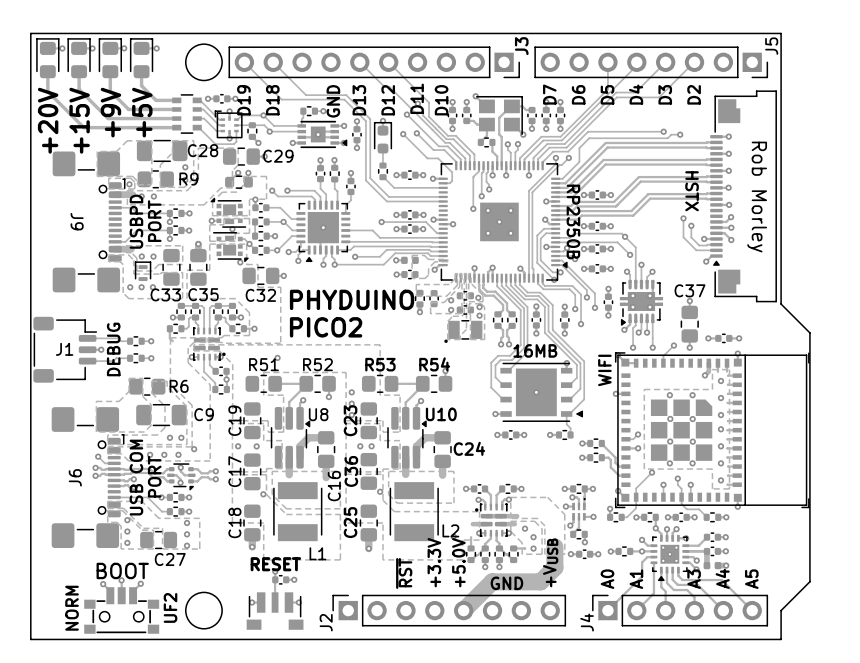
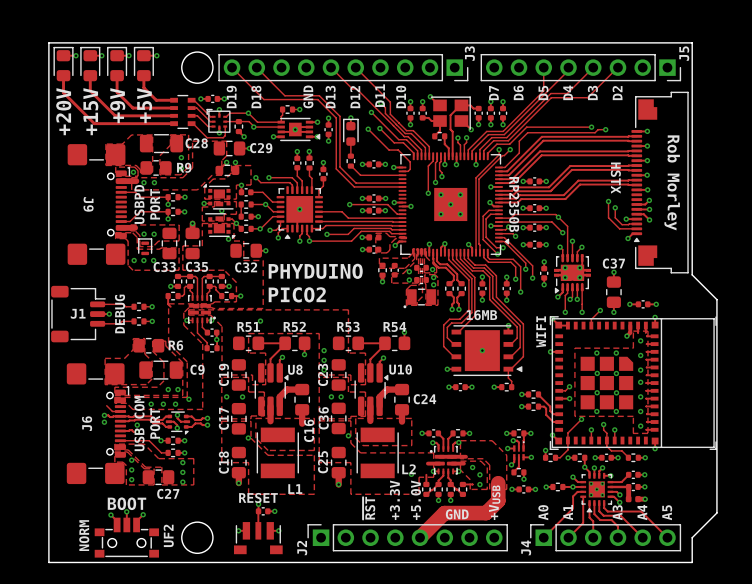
via: (98, 456) -> none
track: (114, 474) (101, 473) (95, 475) -> none
track: (133, 479) (127, 481) (114, 480) -> none

